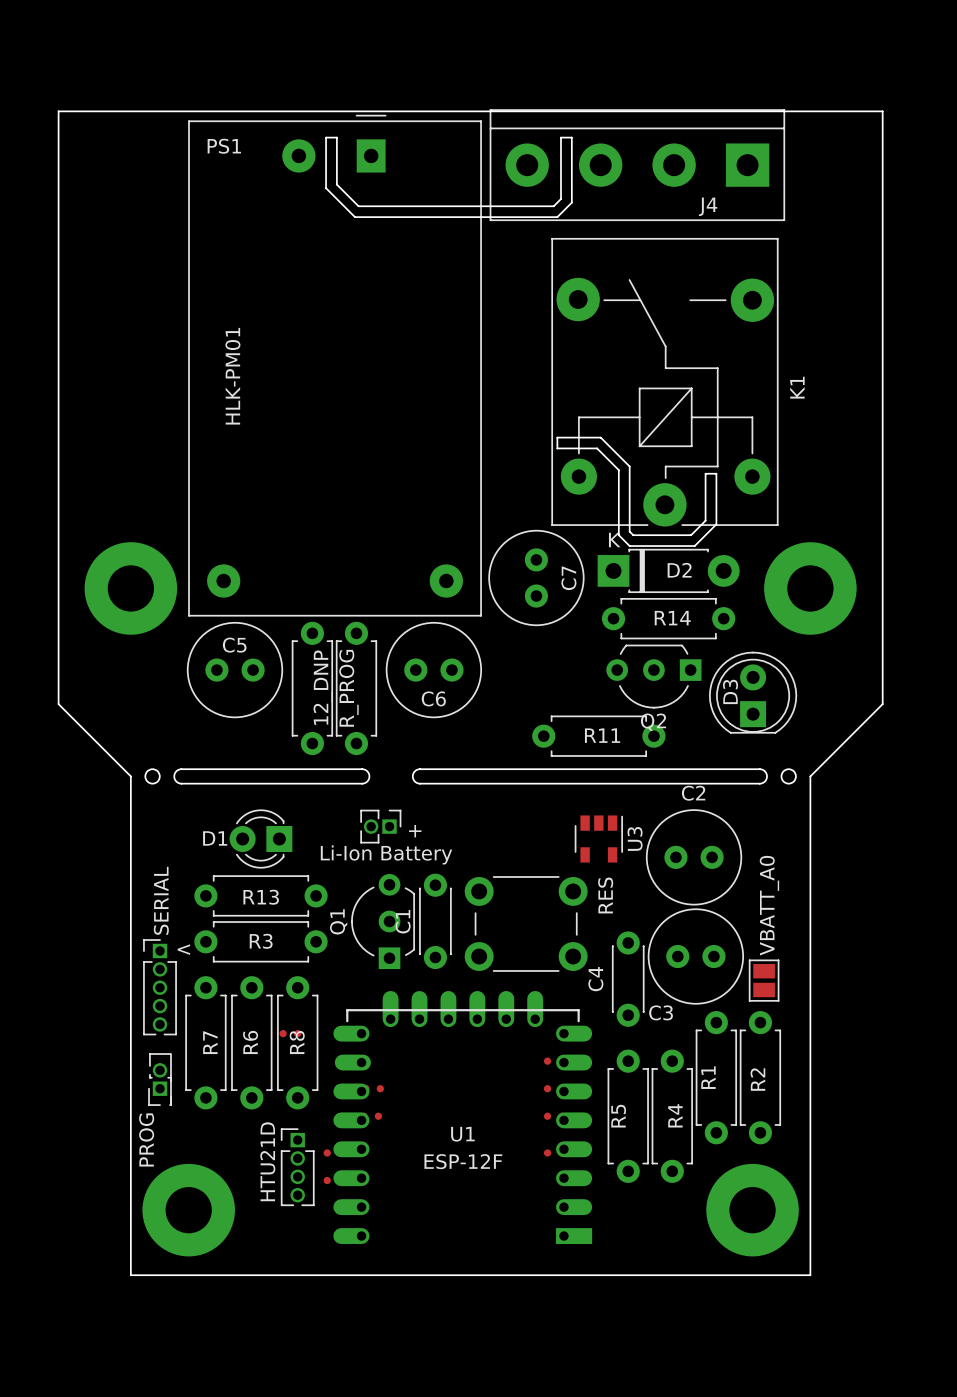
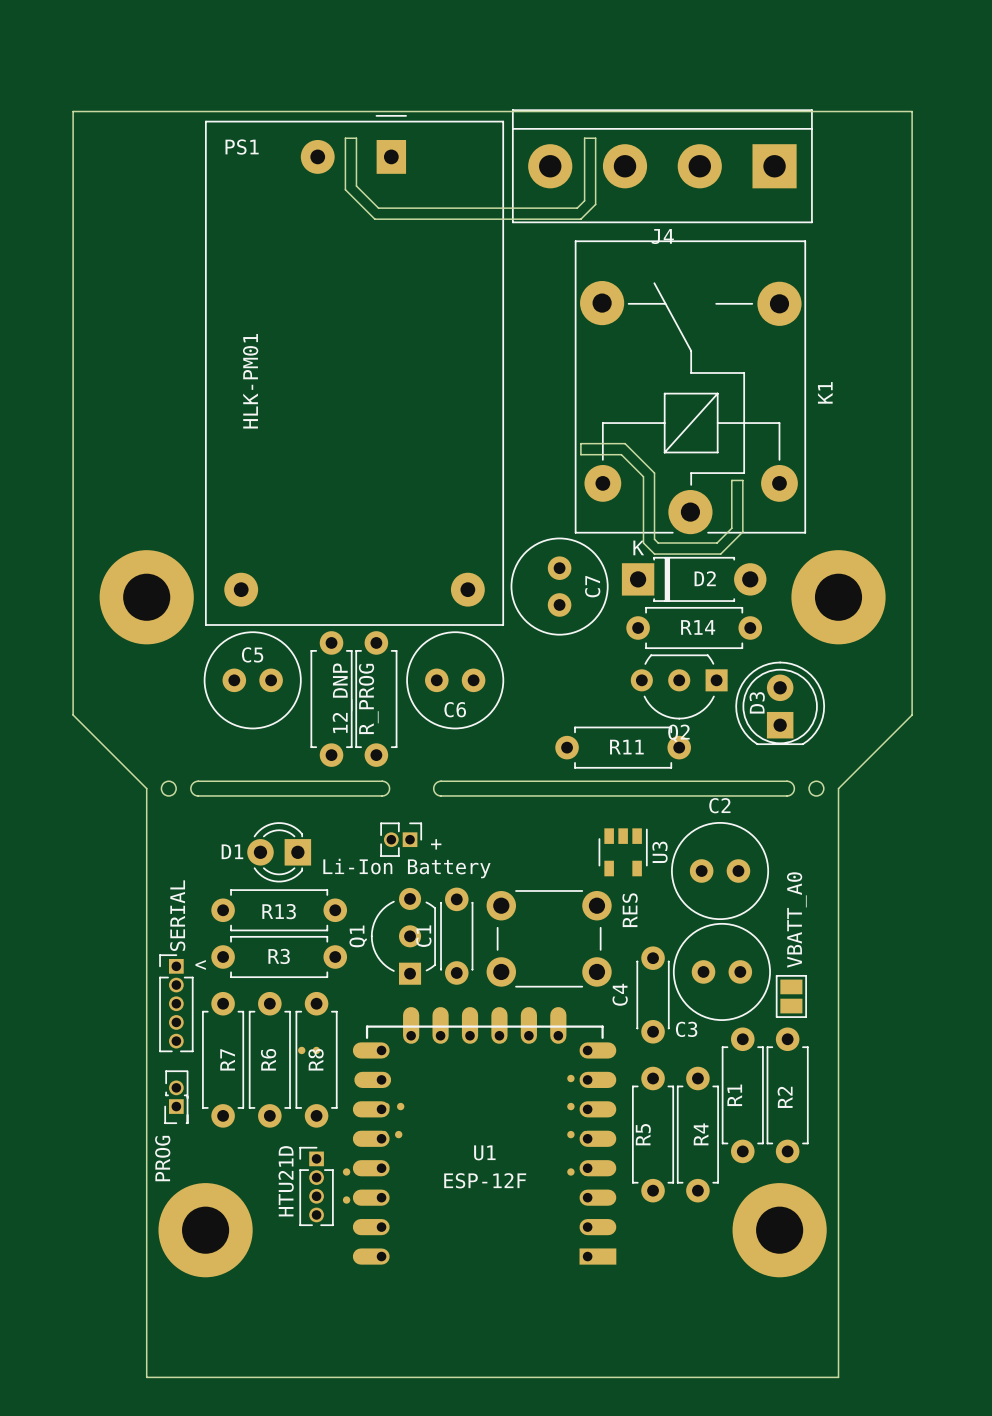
J4 name position: J4 (708, 206) -> J4 (662, 236)
board edge: (130, 1275) (810, 1275) -> (146, 1296) (146, 1377) (838, 1377) (838, 1296)

